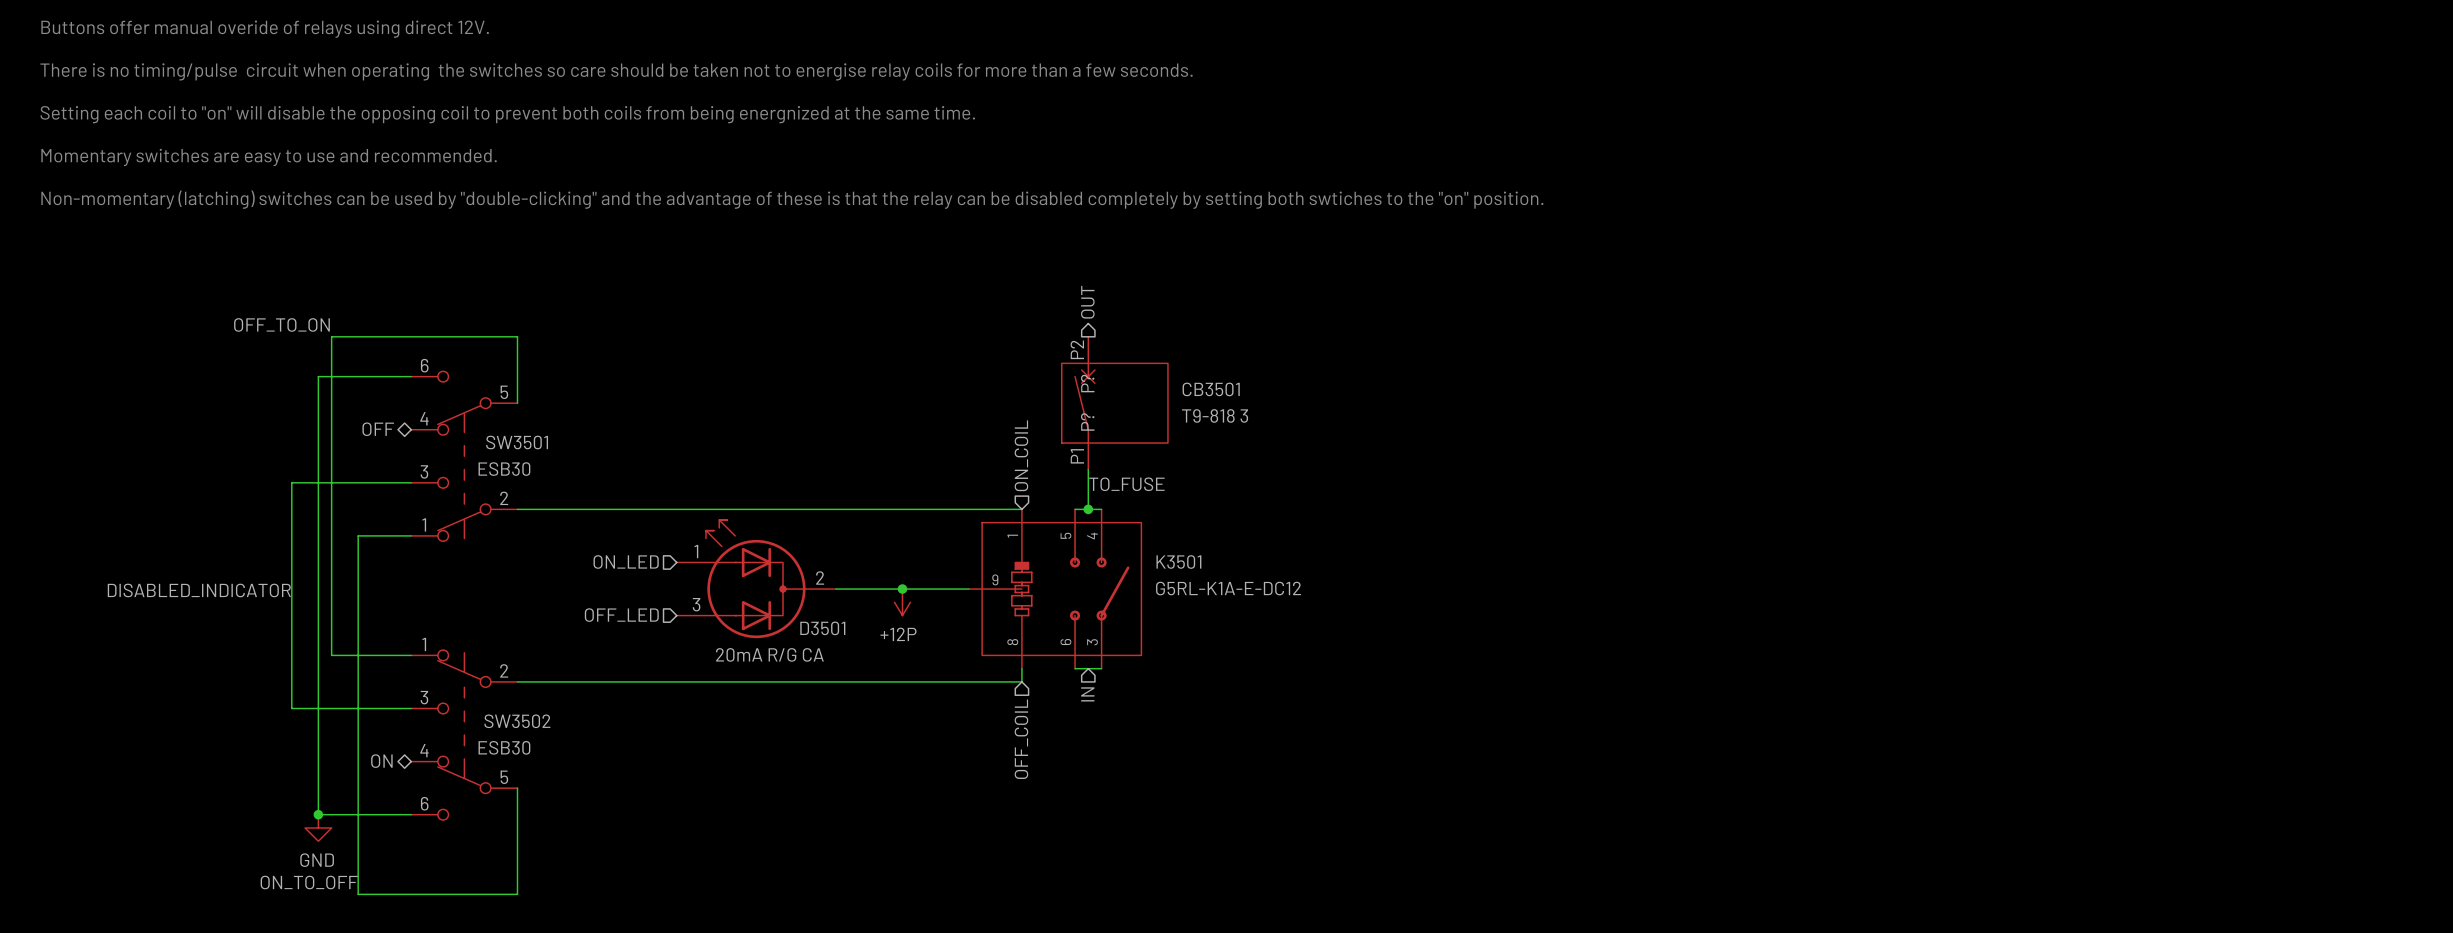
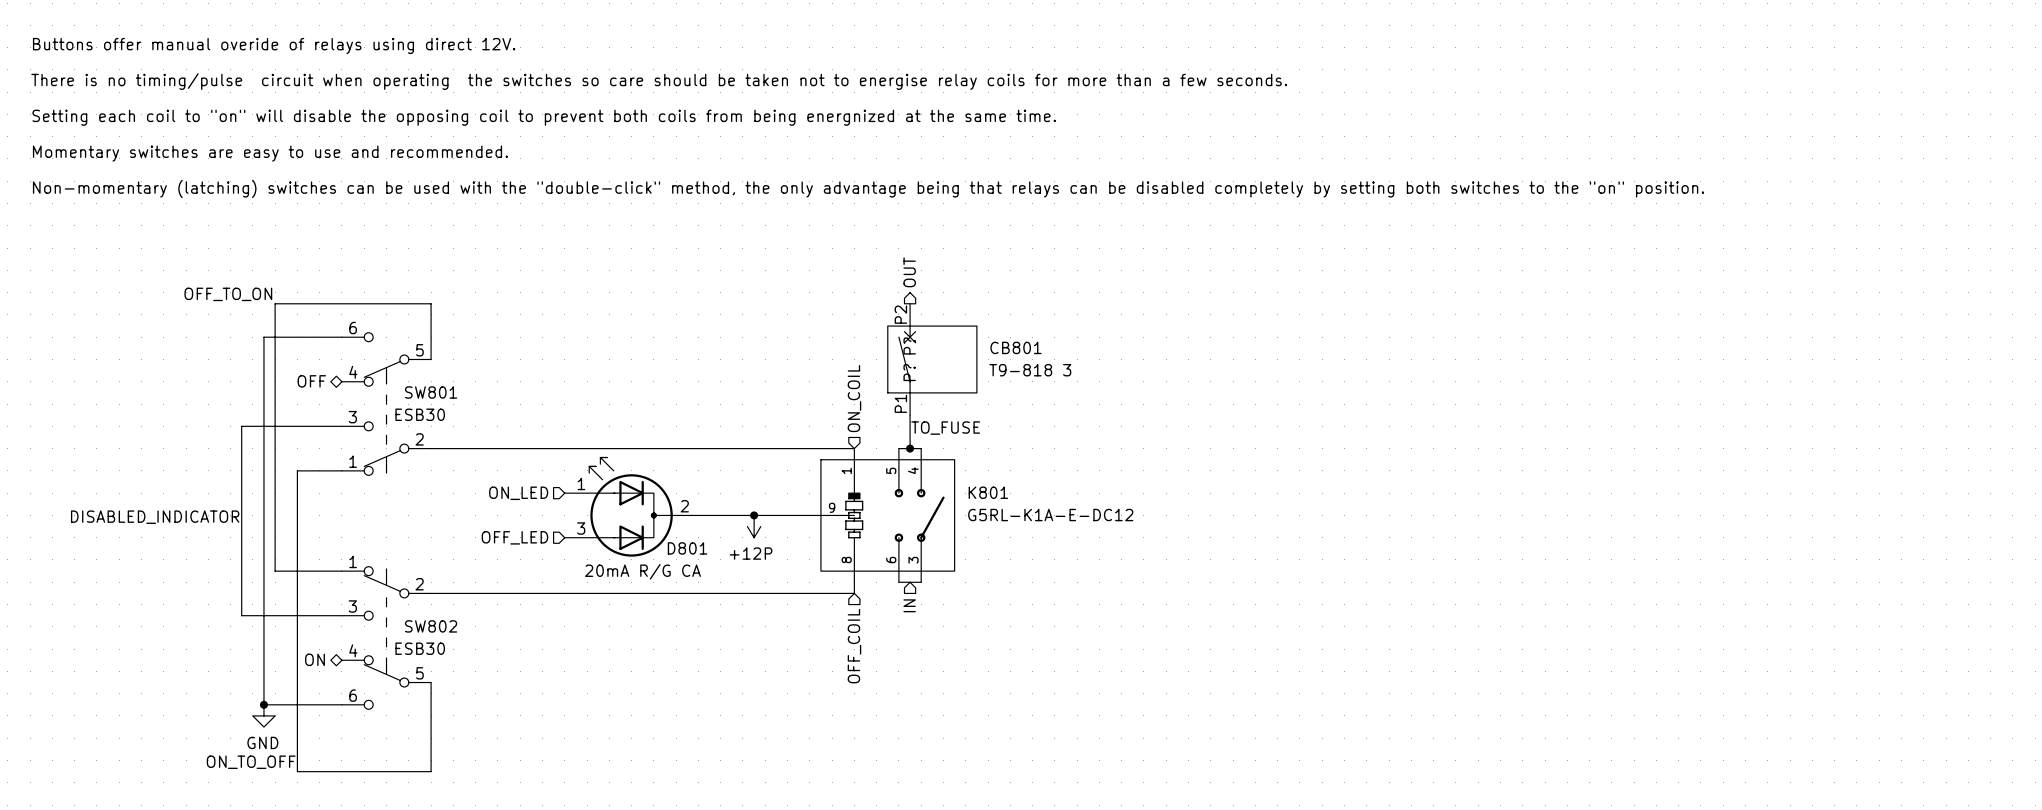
text: Non-momentary (latching) switches can be used by "double-clicking" and the advantage of these is that the relay can be disabled completely by setting both swtiches to the "on" position. (792, 199) -> Non-momentary (latching) switches can be used with the "double-click" method, the only advantage being that relays can be disabled completely by setting both switches to the "on" position. (868, 188)
CB3501 name: CB3501 (1211, 389) -> CB801 (1015, 347)
SW3501 name: SW3501 (517, 442) -> SW801 (431, 392)
K3501 name: K3501 (1178, 561) -> K801 (988, 492)
D3501 name: D3501 (822, 628) -> D801 (687, 548)
SW3502 name: SW3502 (517, 721) -> SW802 (431, 626)

